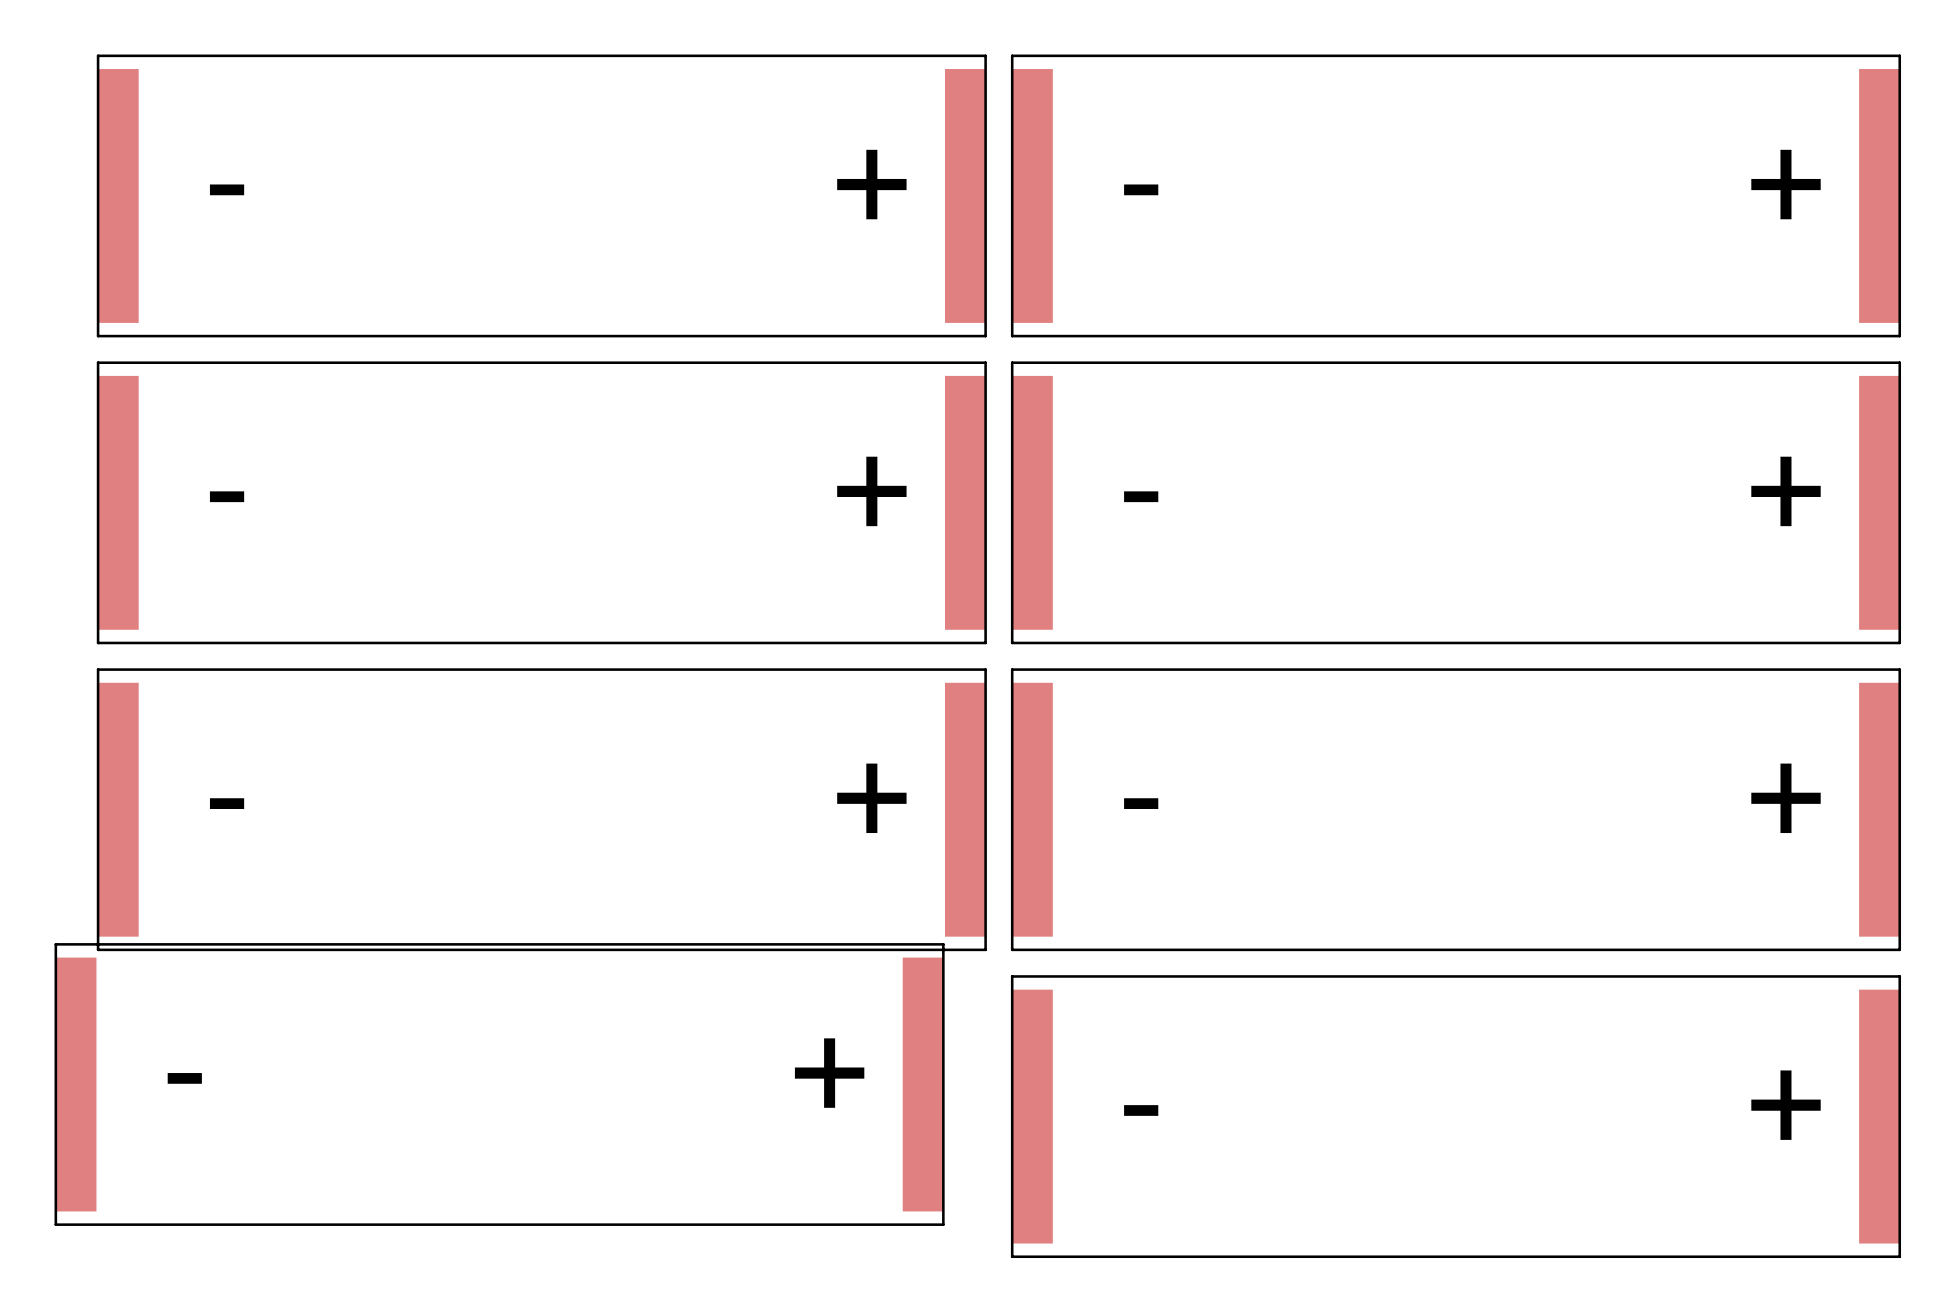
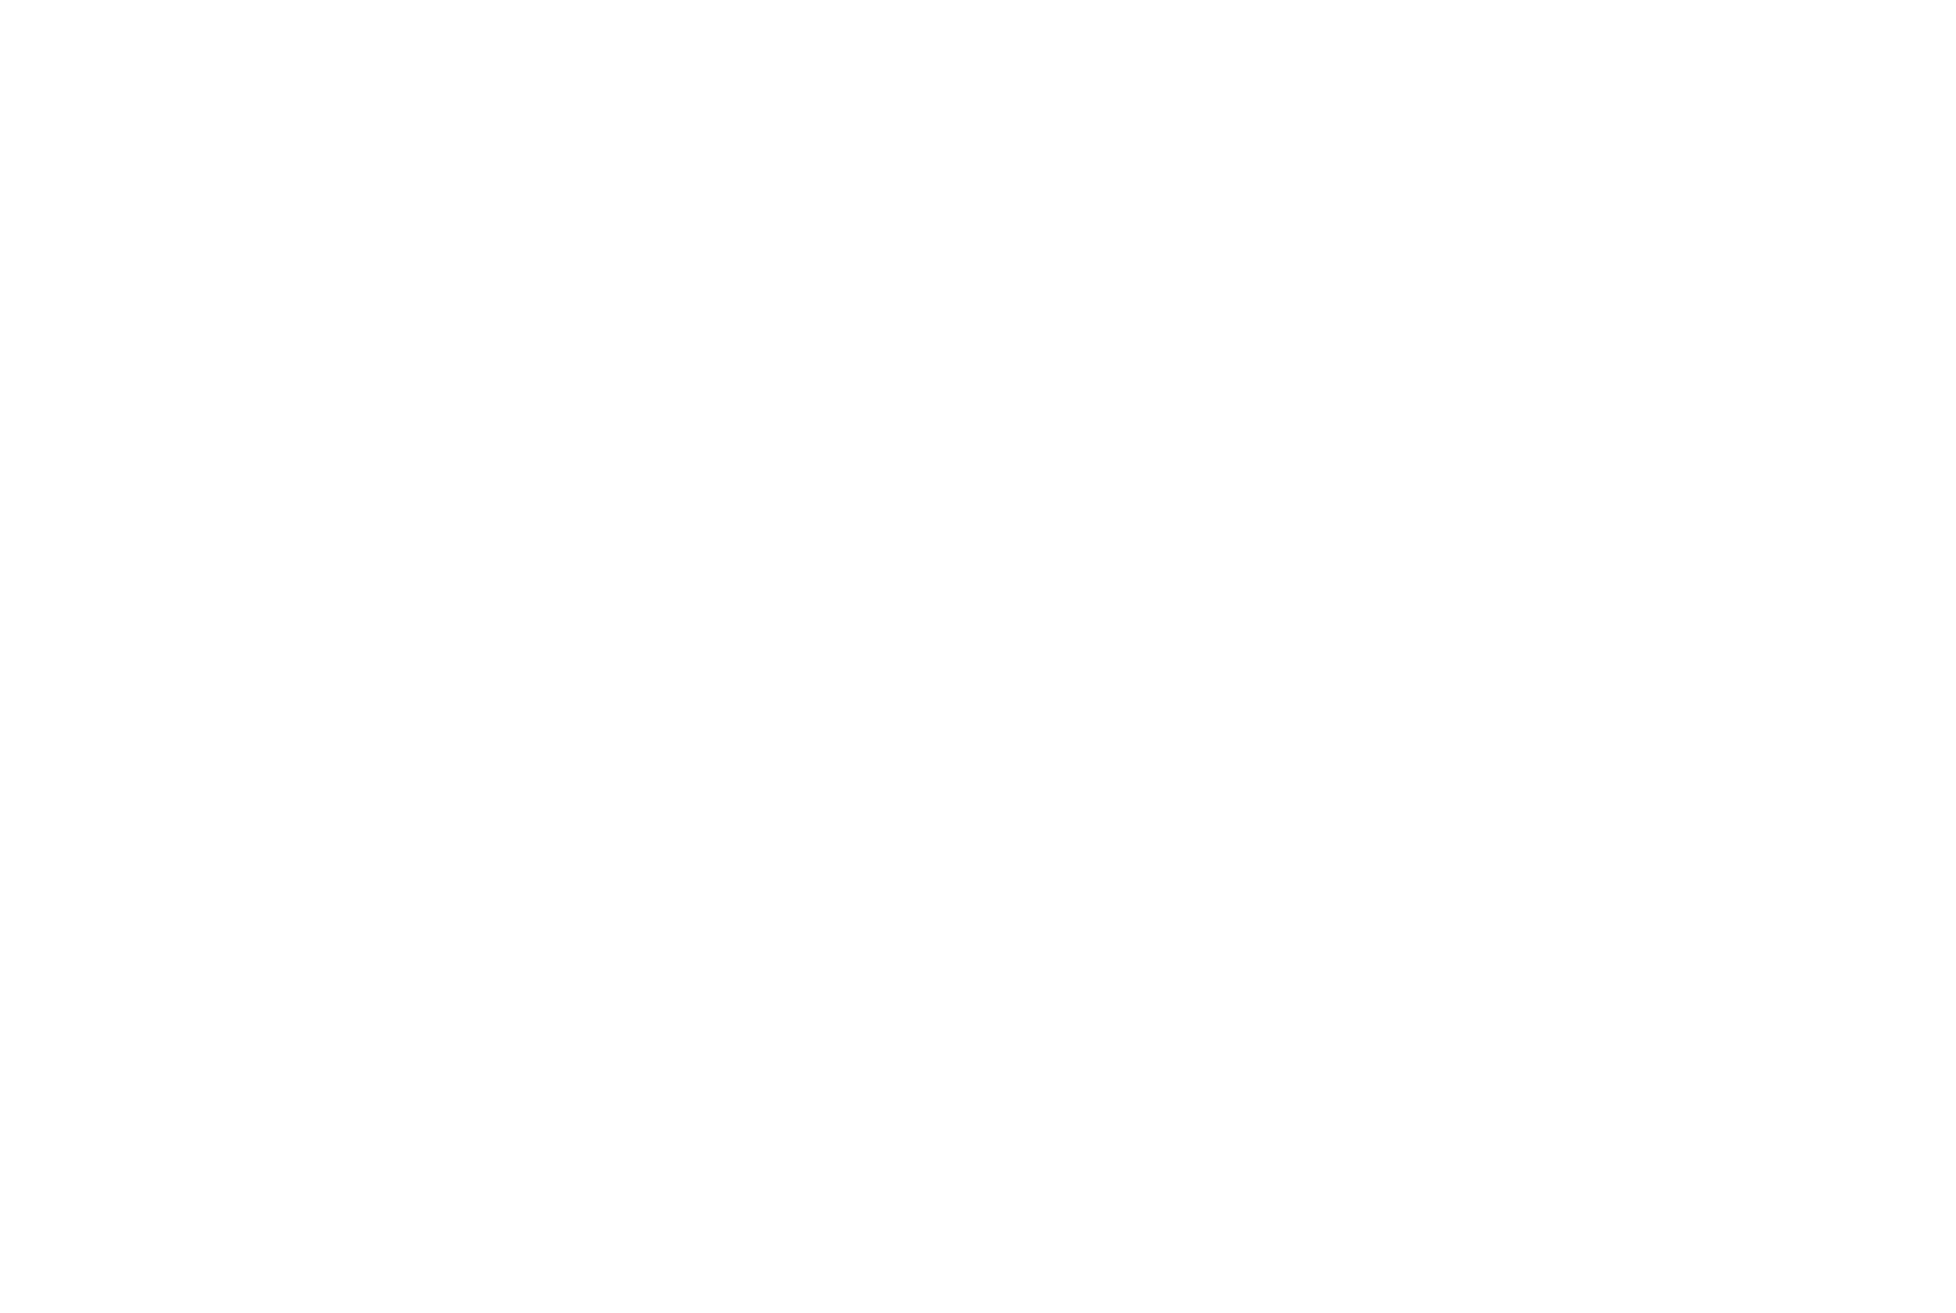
part: (541, 195) -> none
part: (1455, 195) -> none
part: (541, 502) -> none
part: (1455, 502) -> none
part: (541, 809) -> none
part: (1455, 809) -> none
part: (499, 1084) -> none
part: (1455, 1116) -> none

